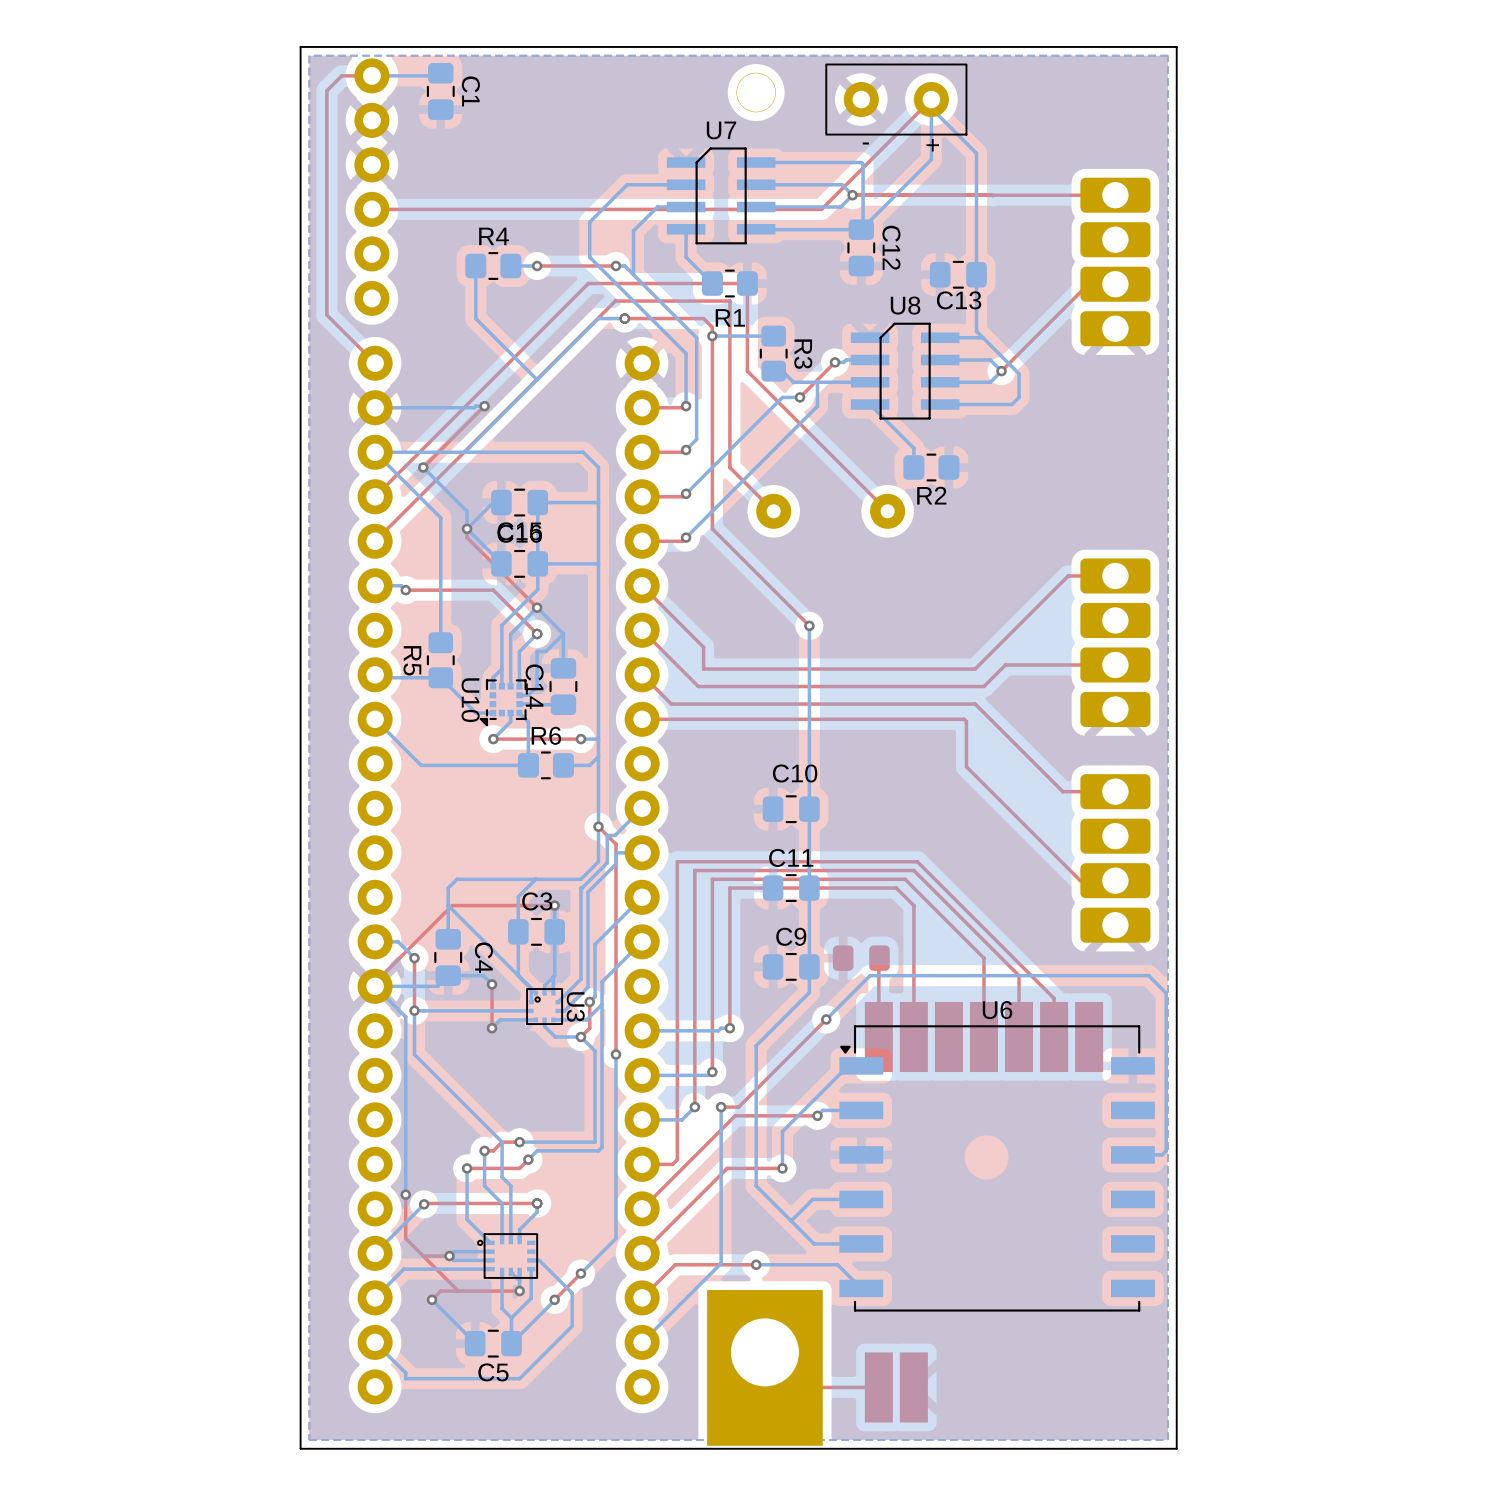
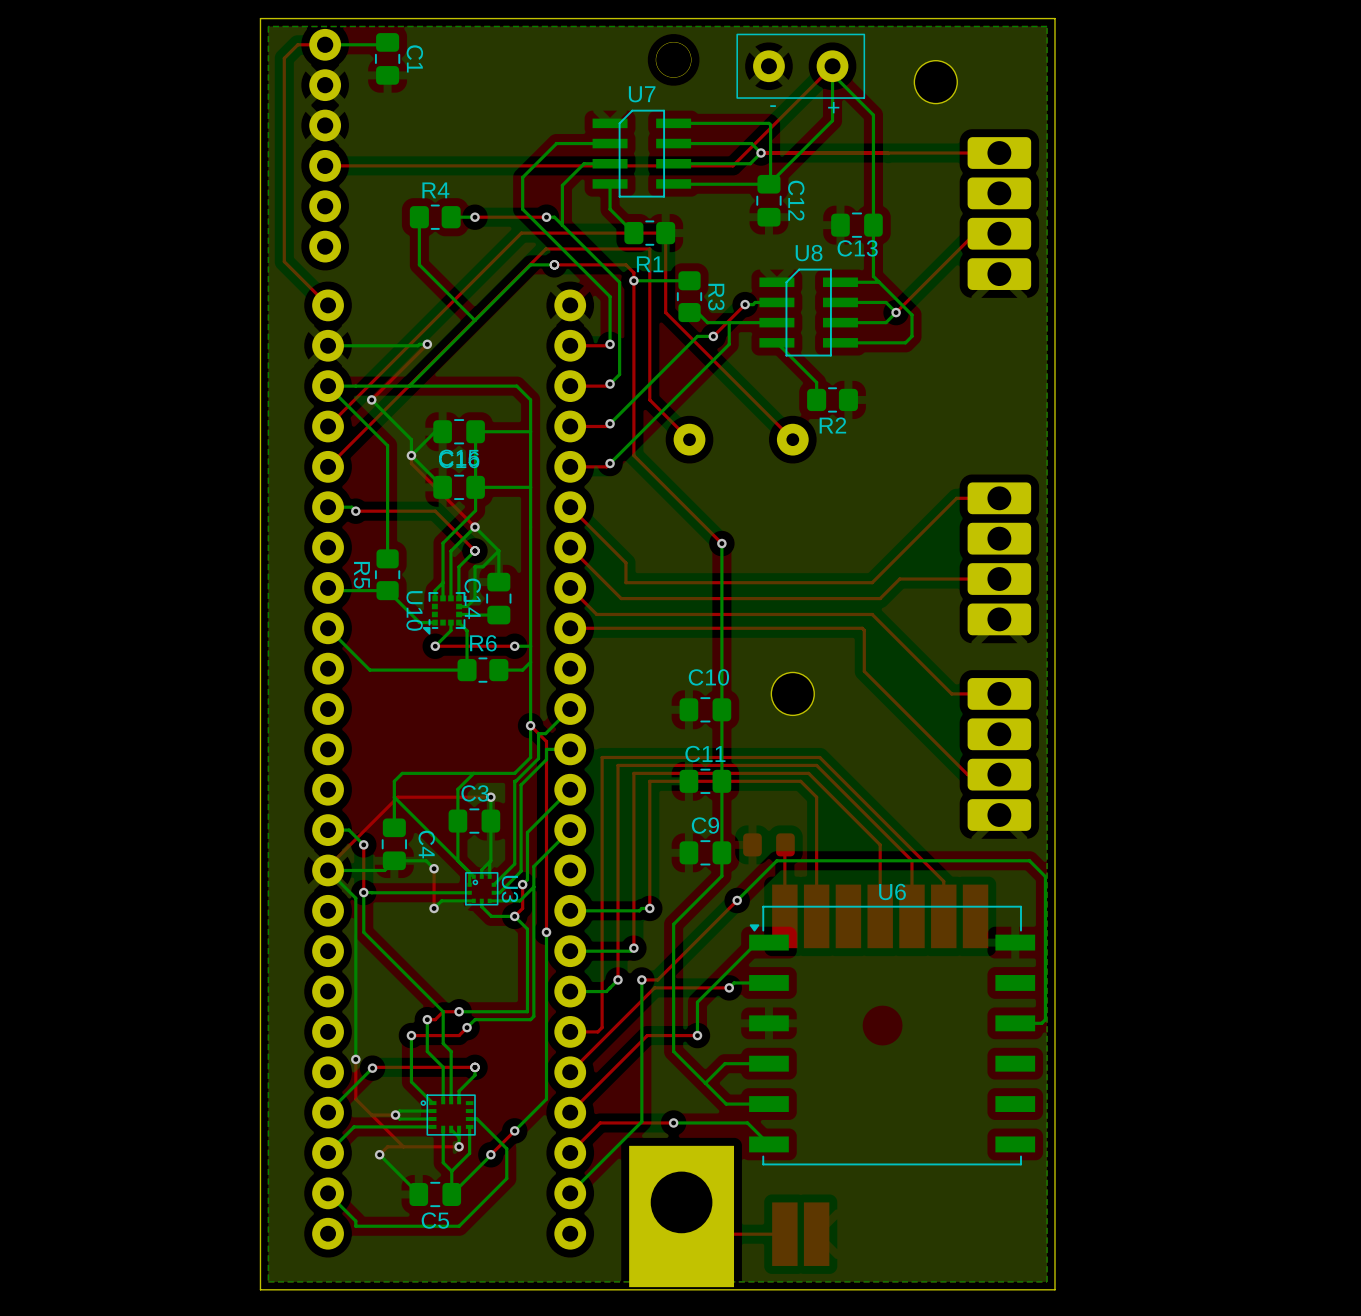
part: none -> (935, 82)
part: none -> (792, 693)

